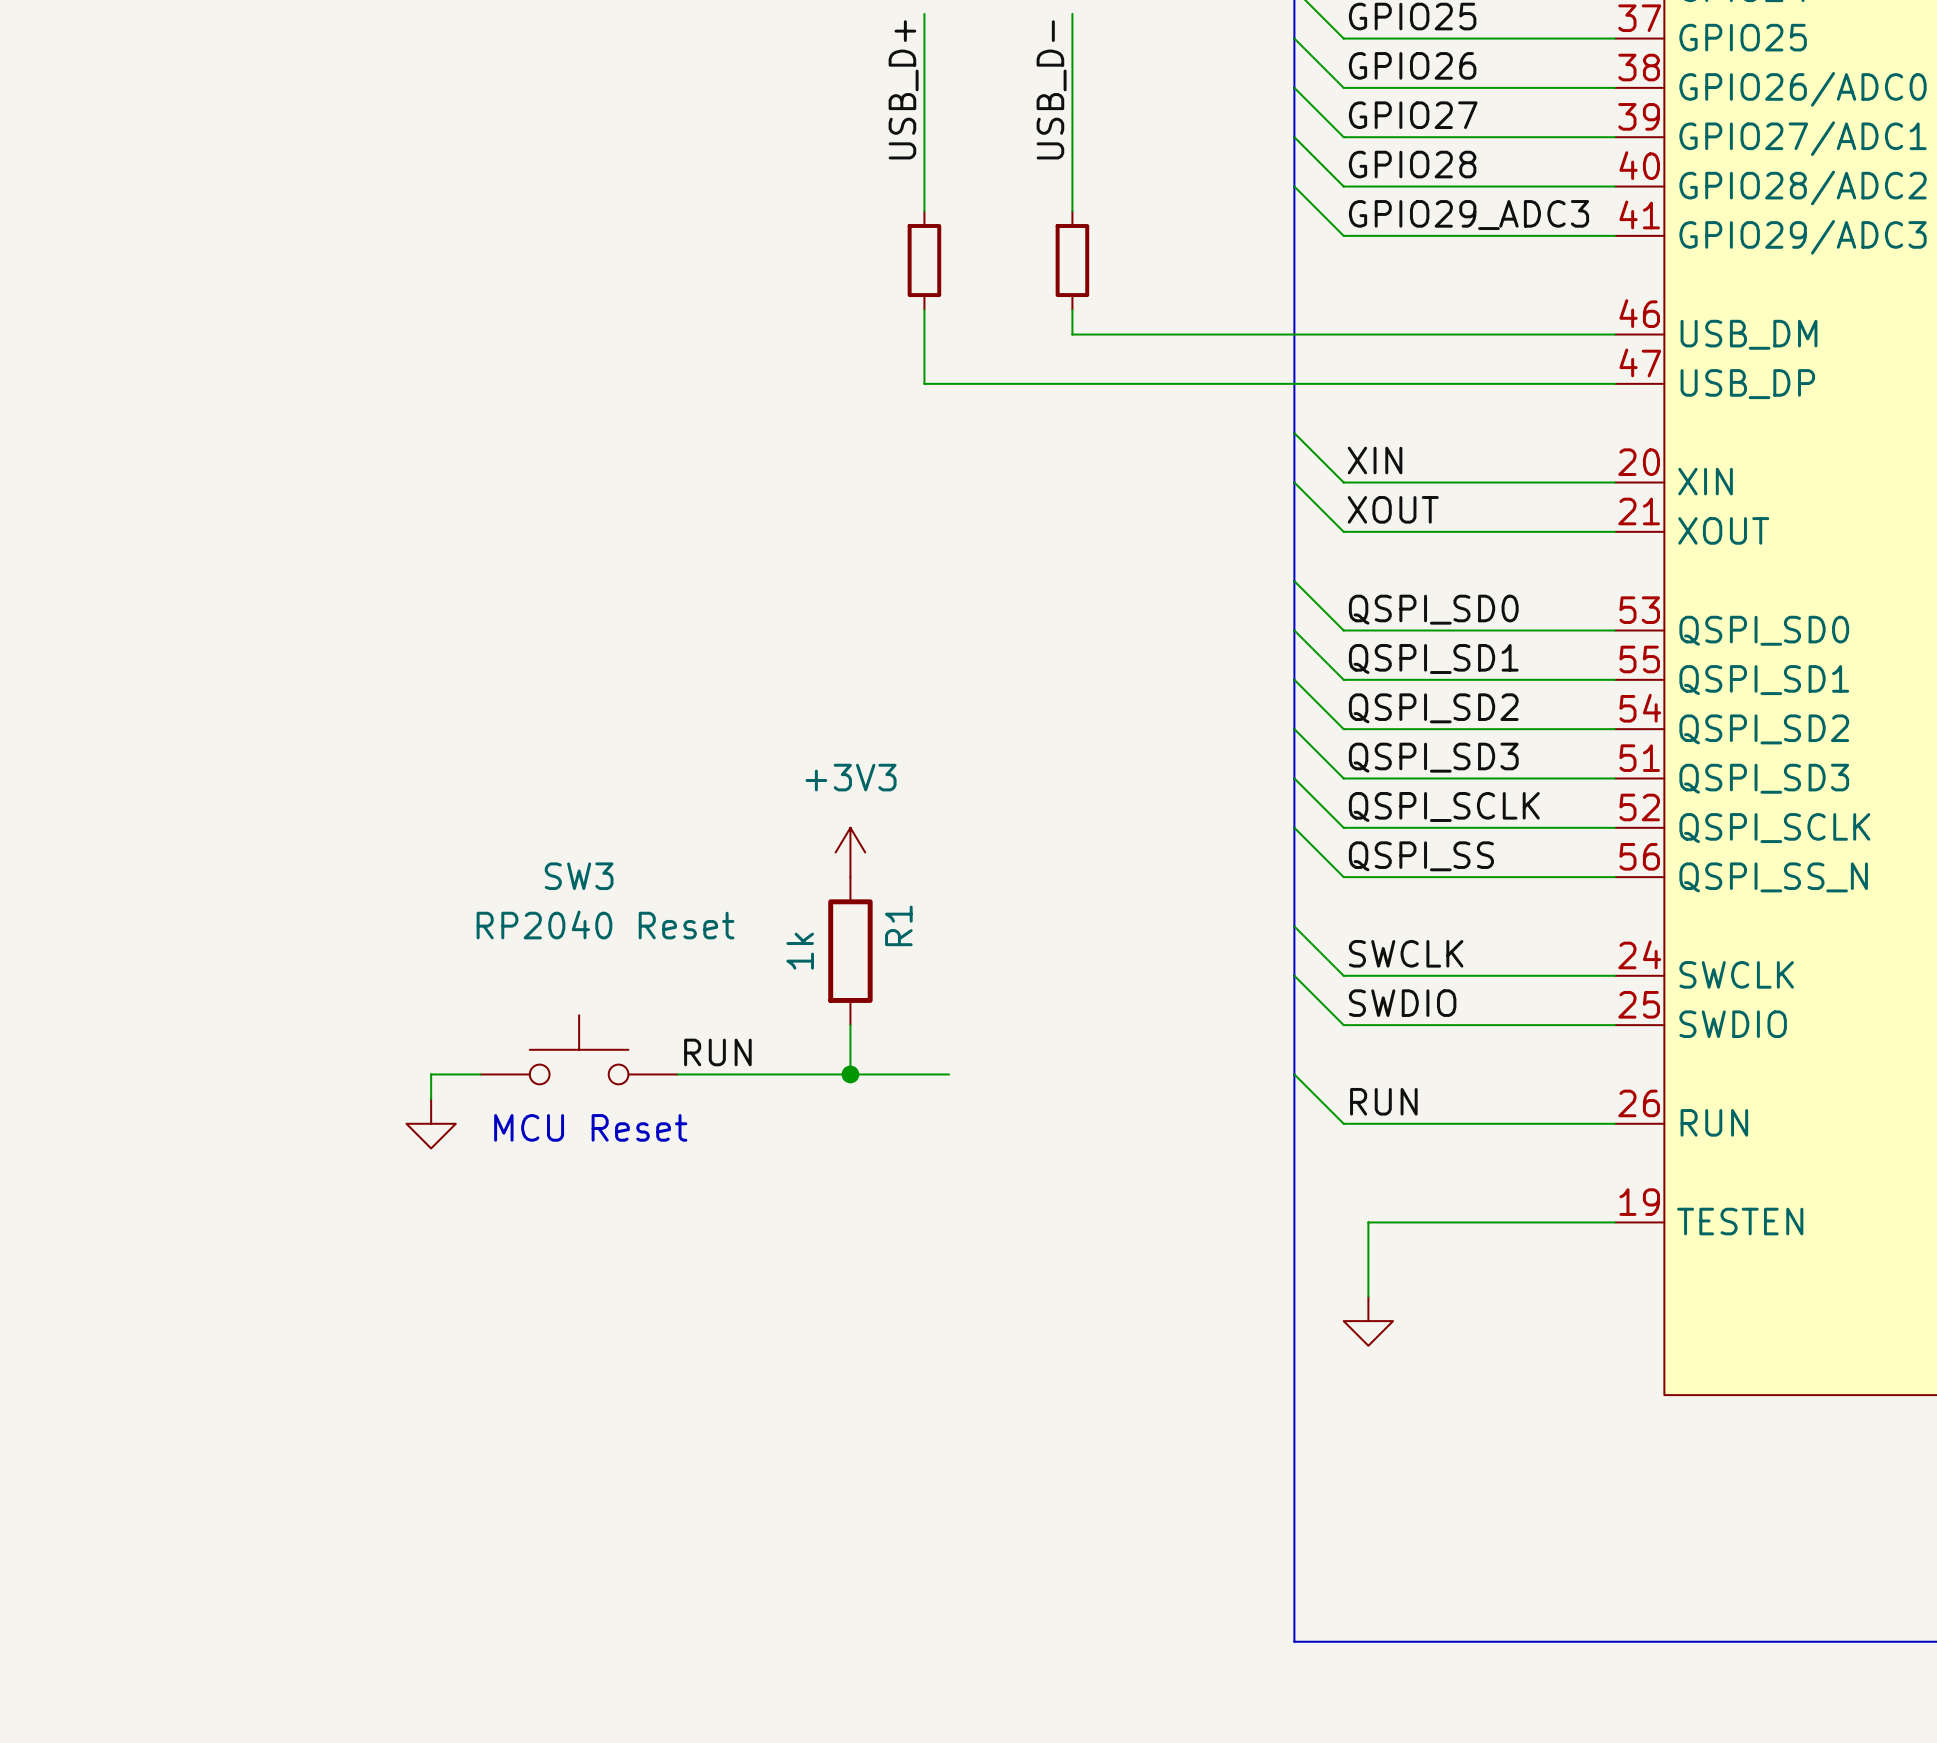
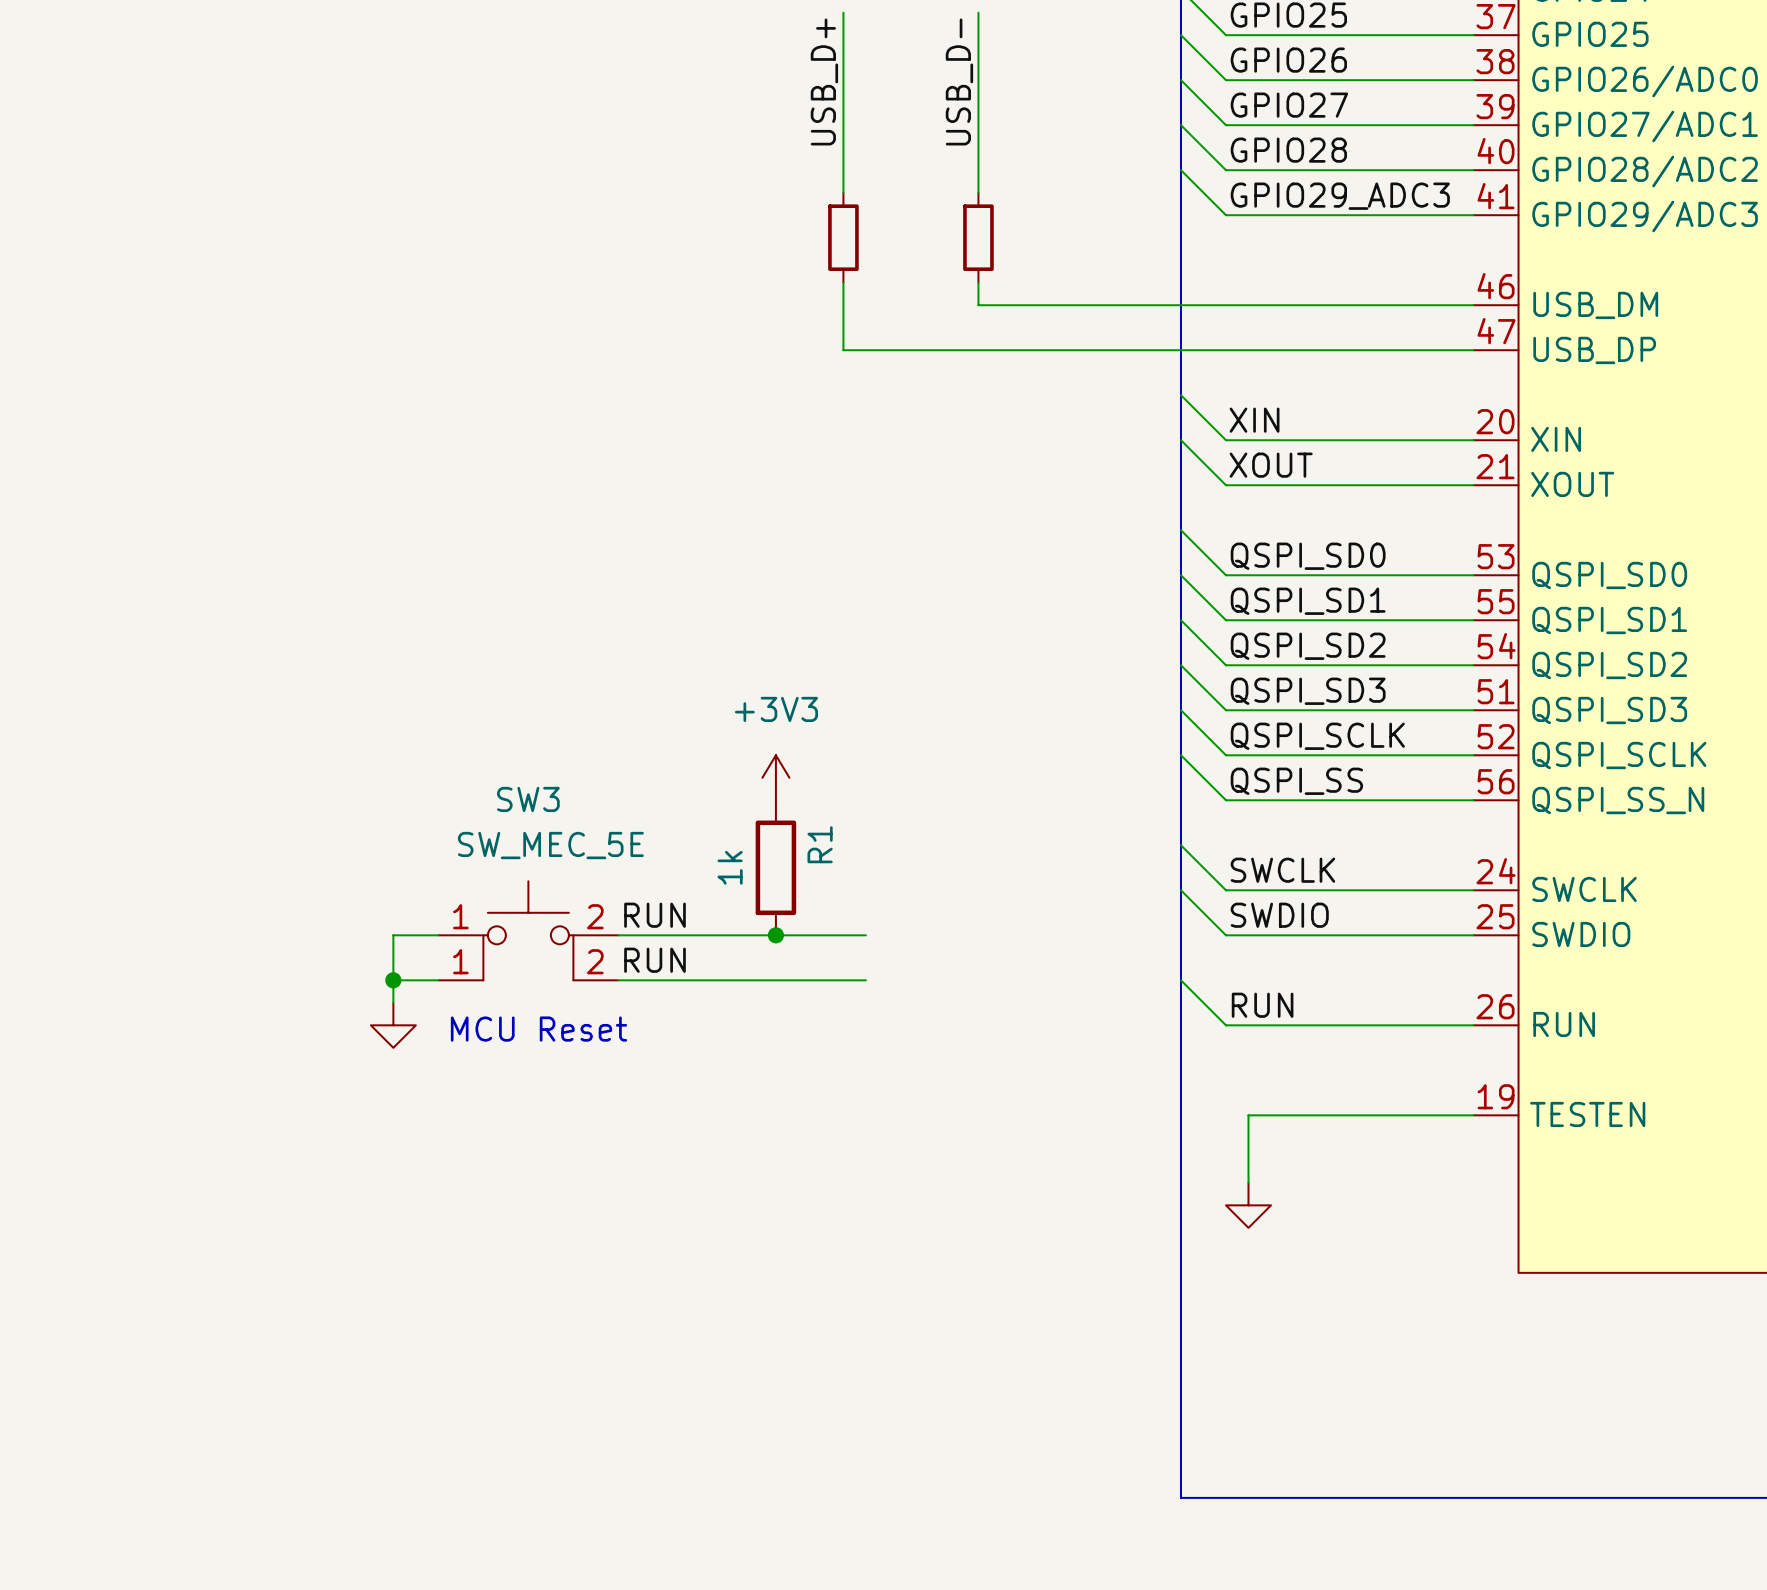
SW3 value: RP2040 Reset (605, 924) -> SW_MEC_5E (550, 845)
label: none -> RUN (655, 915)
SW3 symbol: [480, 1015, 678, 1085] -> [438, 881, 619, 981]
wire: none -> (438, 935) (393, 935) (393, 980)
wire: none -> (618, 935) (865, 935)
wire: (850, 1025) (850, 1074) -> none
junction: none -> (393, 980)
junction position: (850, 1074) -> (775, 935)

